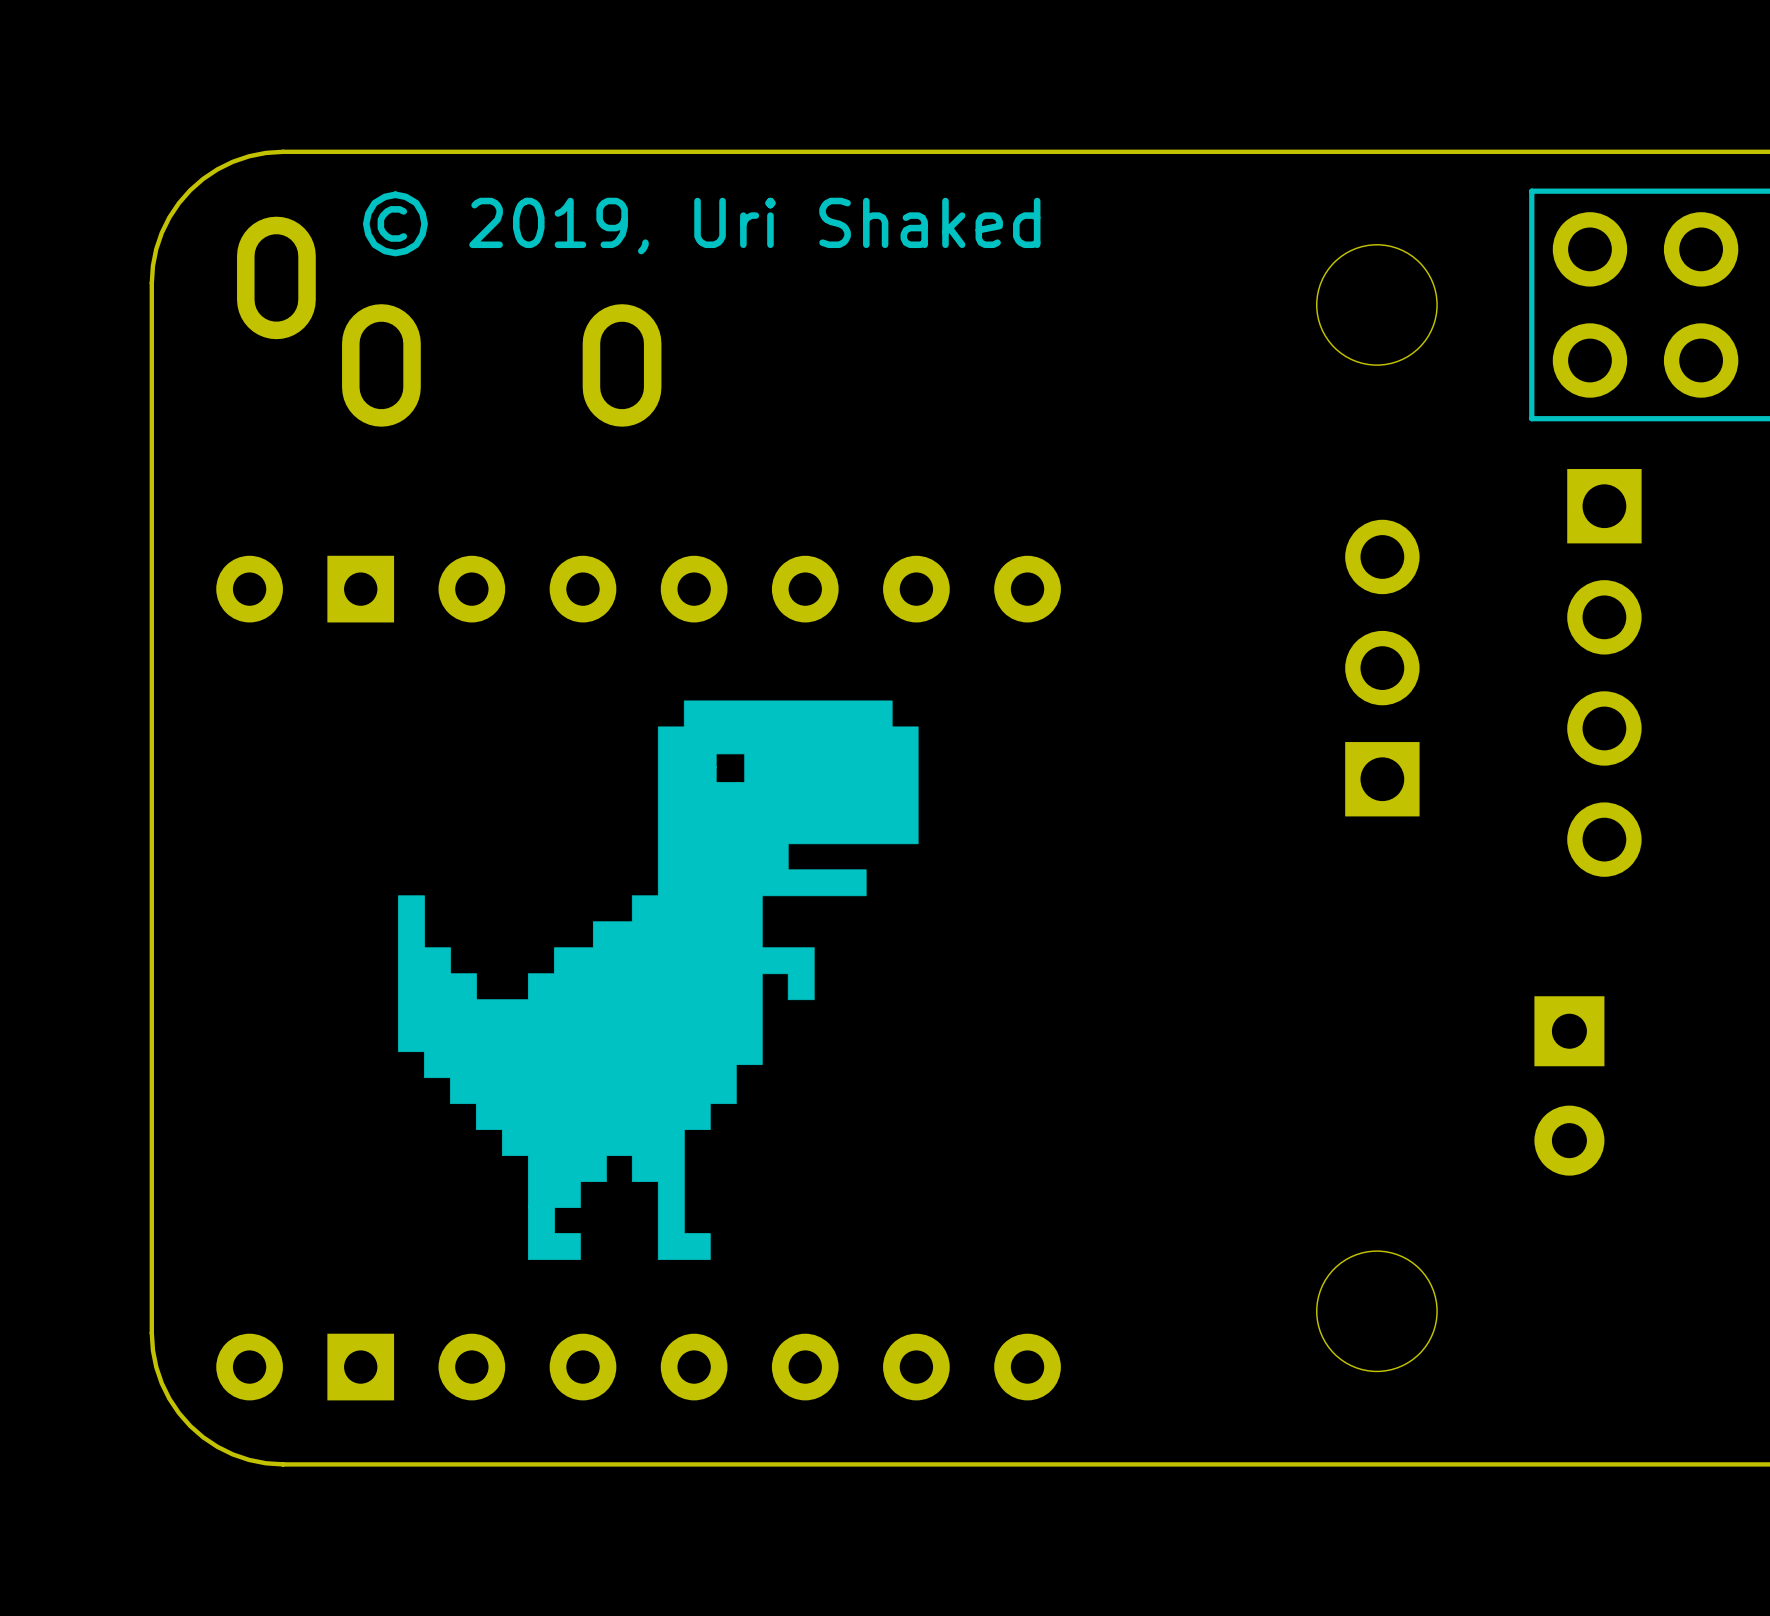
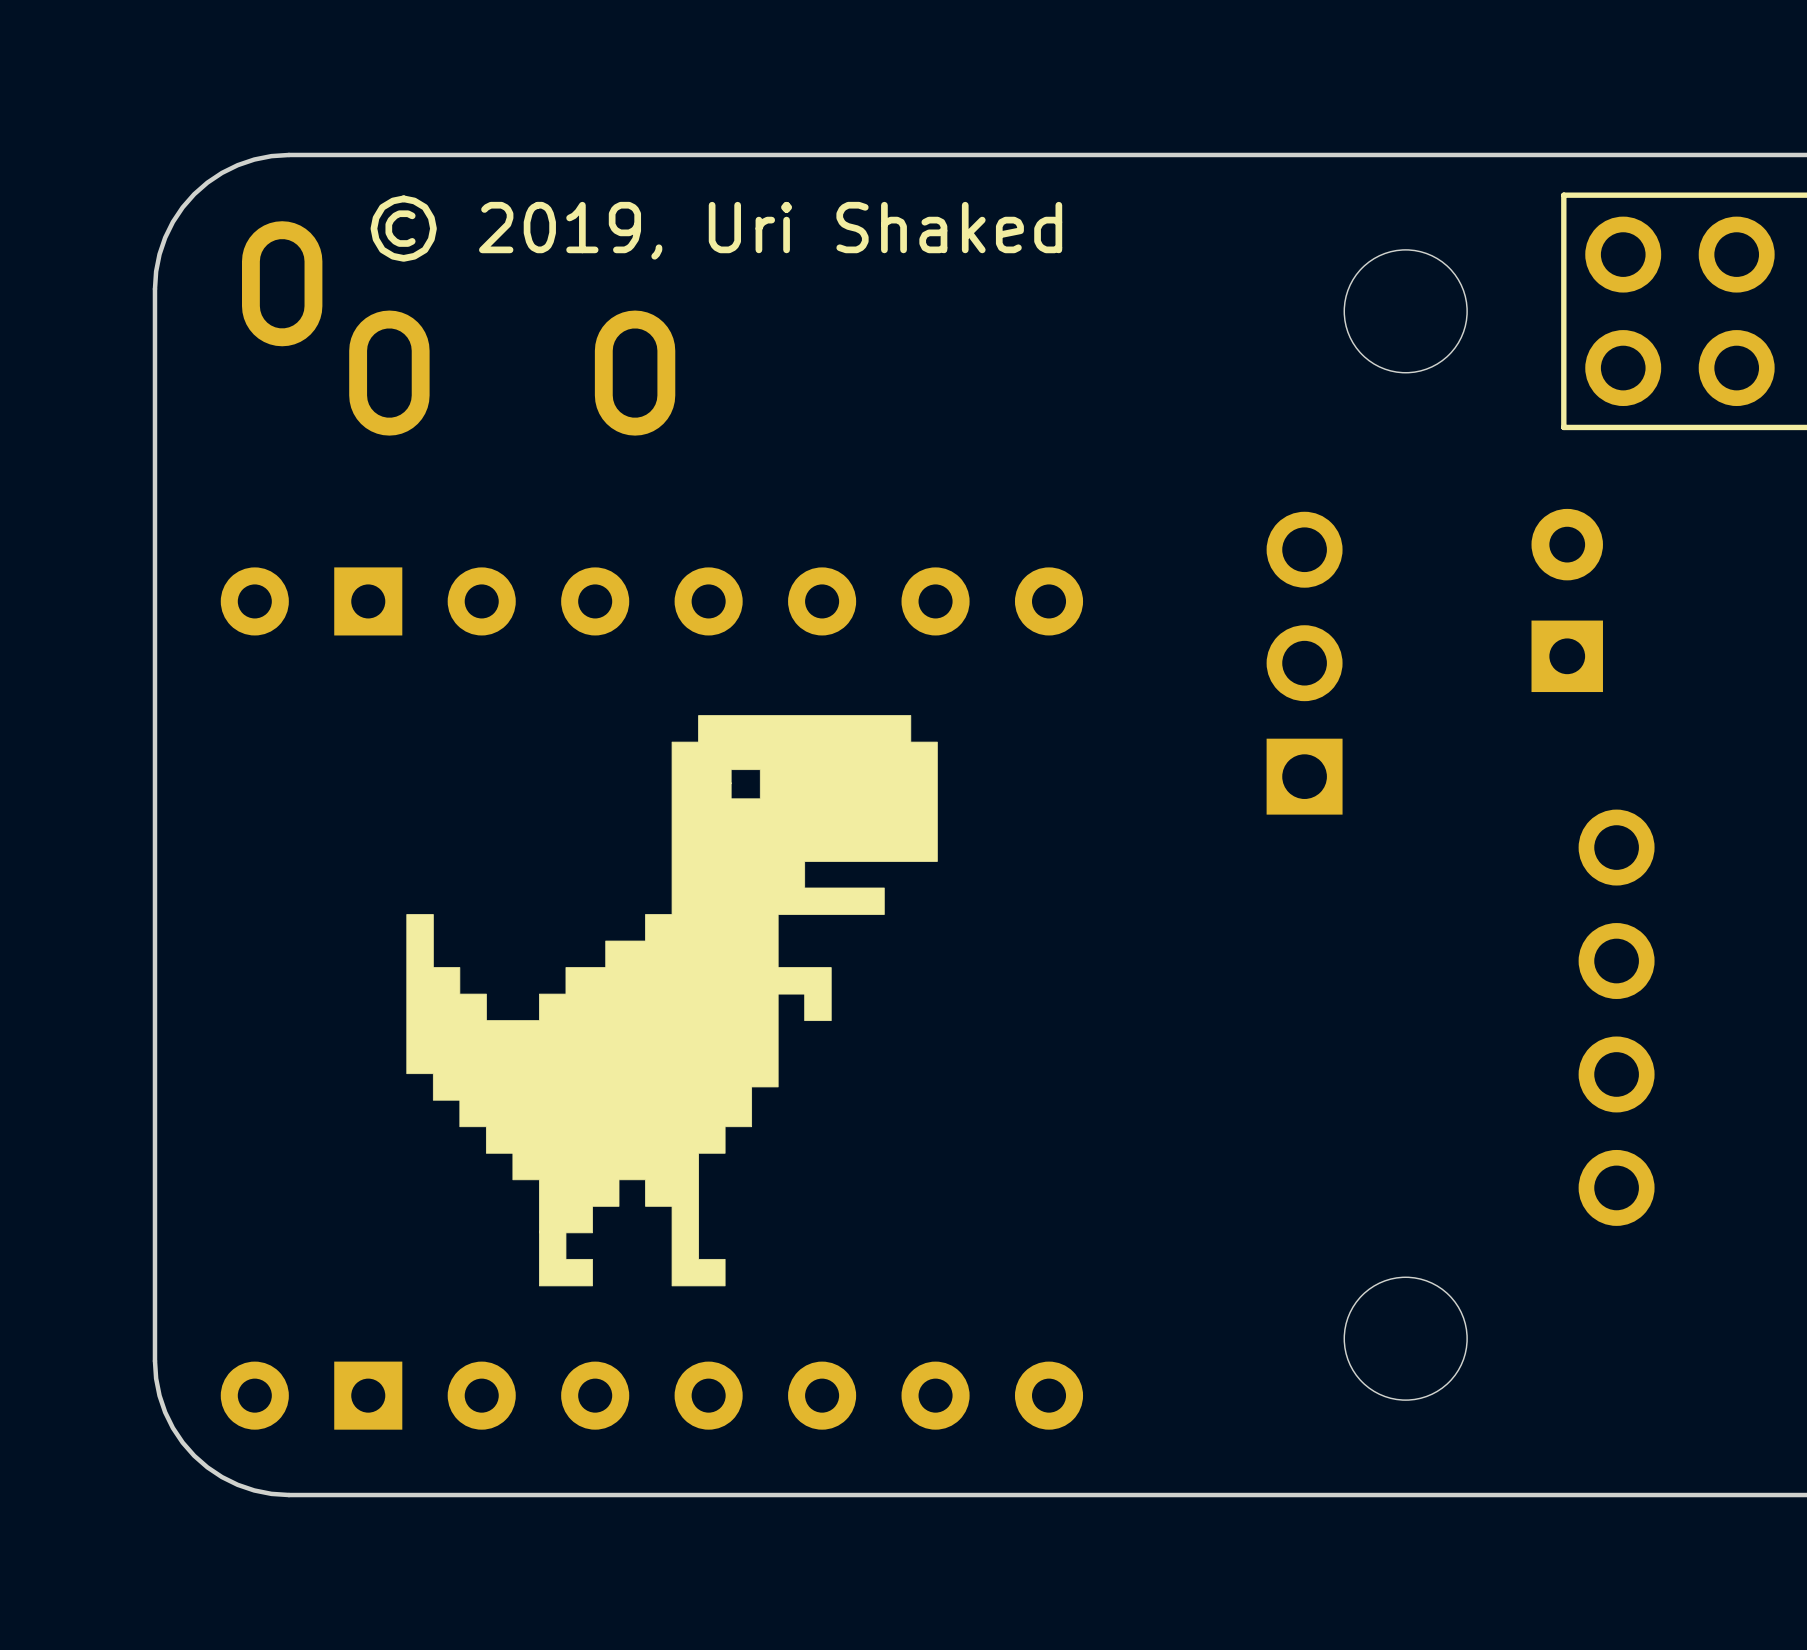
part position: (1382, 668) -> (1304, 663)
part: (1604, 672) -> none
part: none -> (1616, 1017)
part rotation: 0° (1569, 1085) -> 180° (1567, 600)
part position: (1569, 1085) -> (1567, 600)

